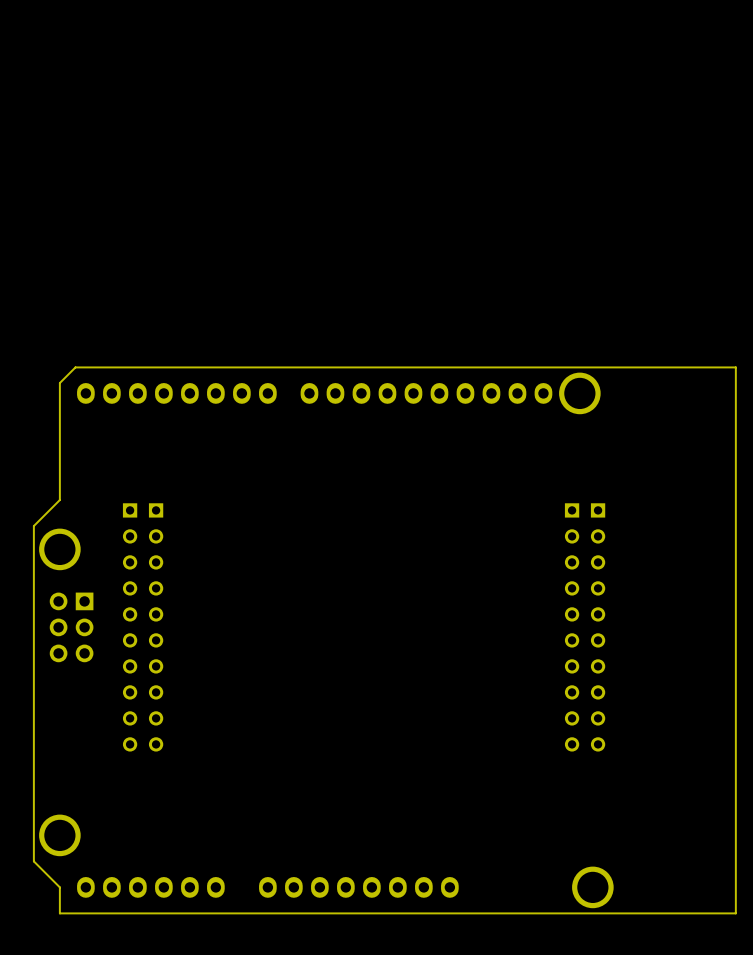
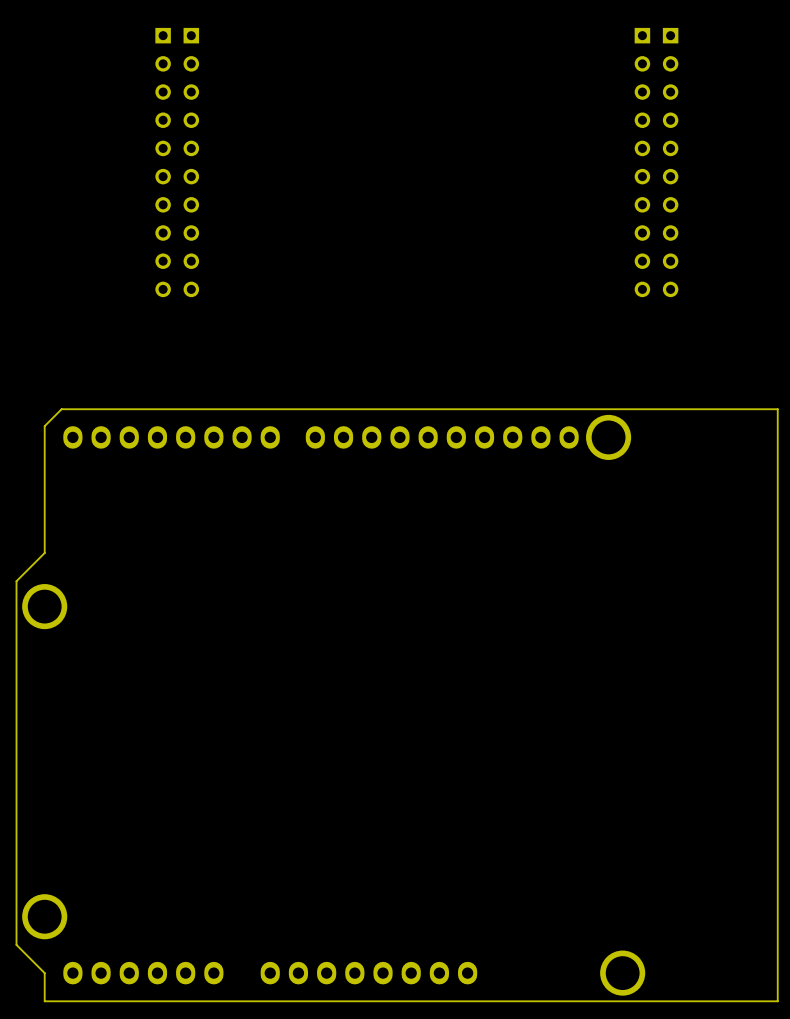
part: none -> (163, 162)
part: none -> (191, 162)
part: none -> (642, 162)
part: none -> (670, 162)
part: (71, 627) -> none
part: (130, 627) -> none
part: (156, 627) -> none
part: (572, 627) -> none
part: (598, 627) -> none

